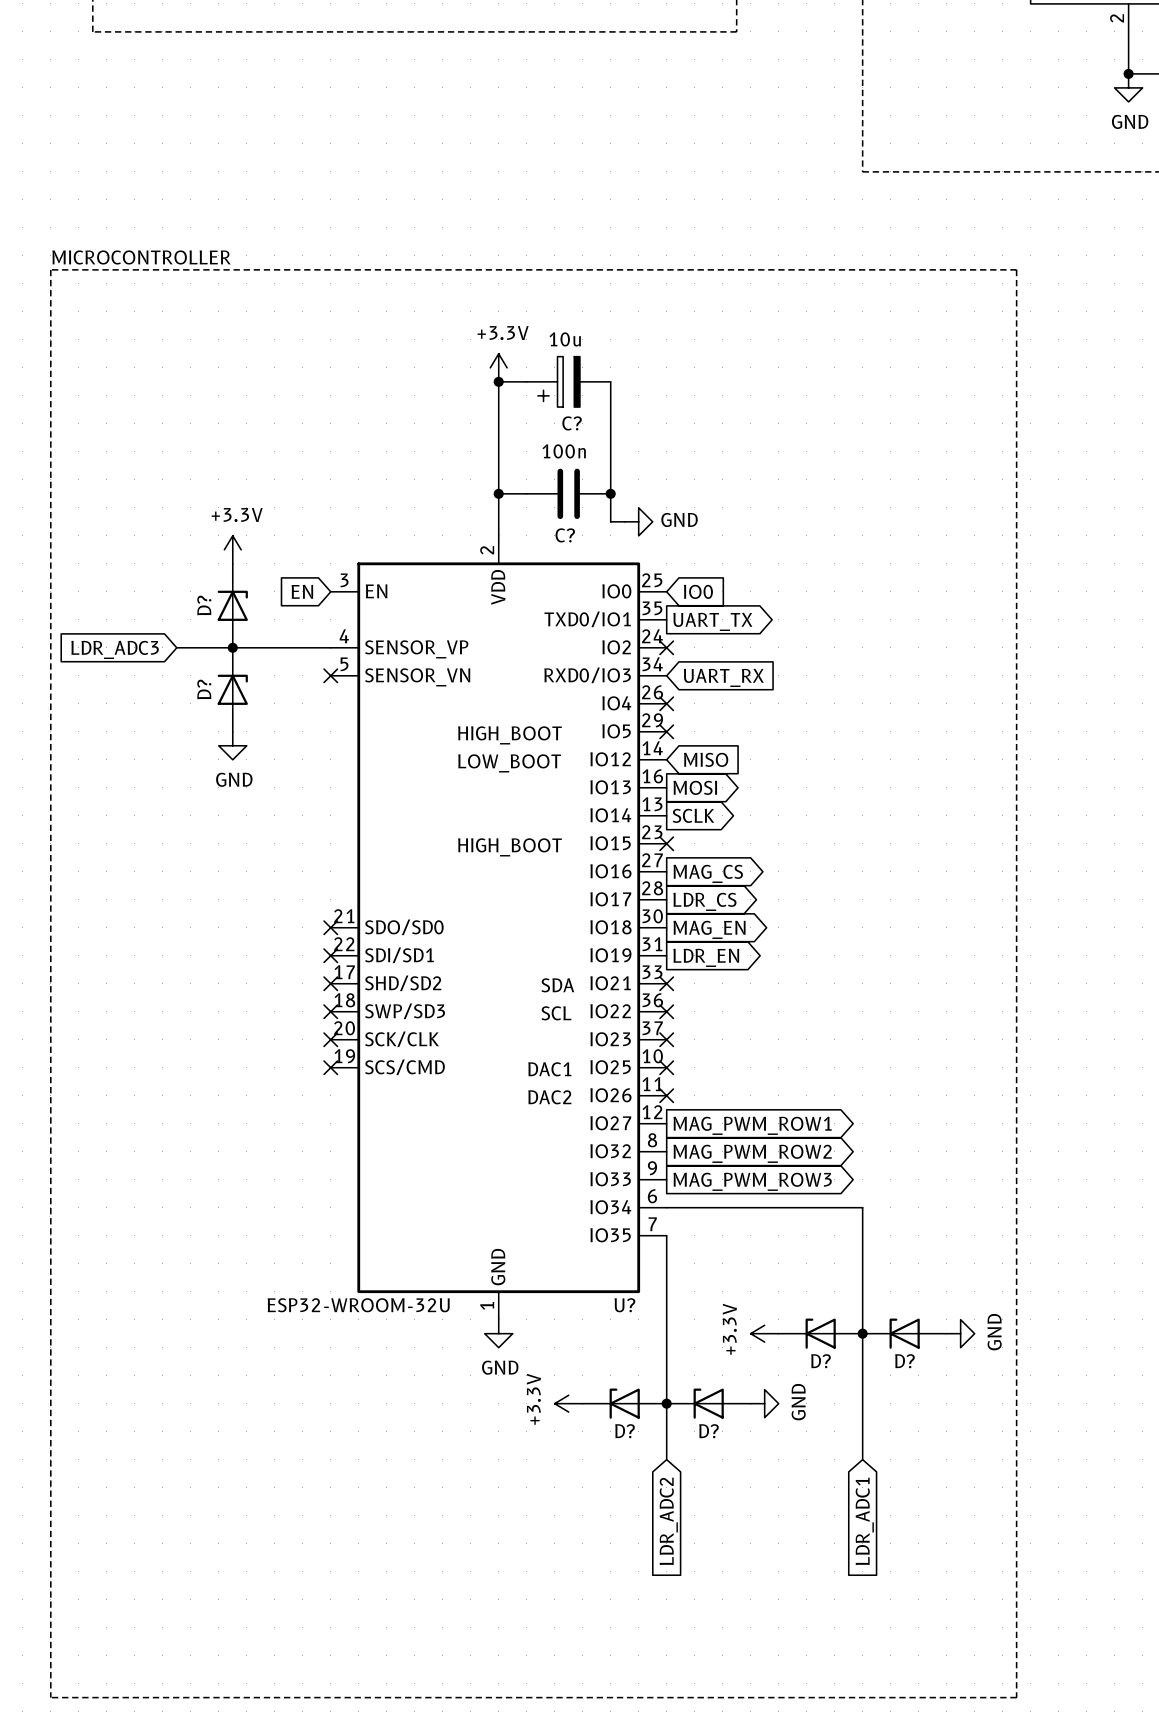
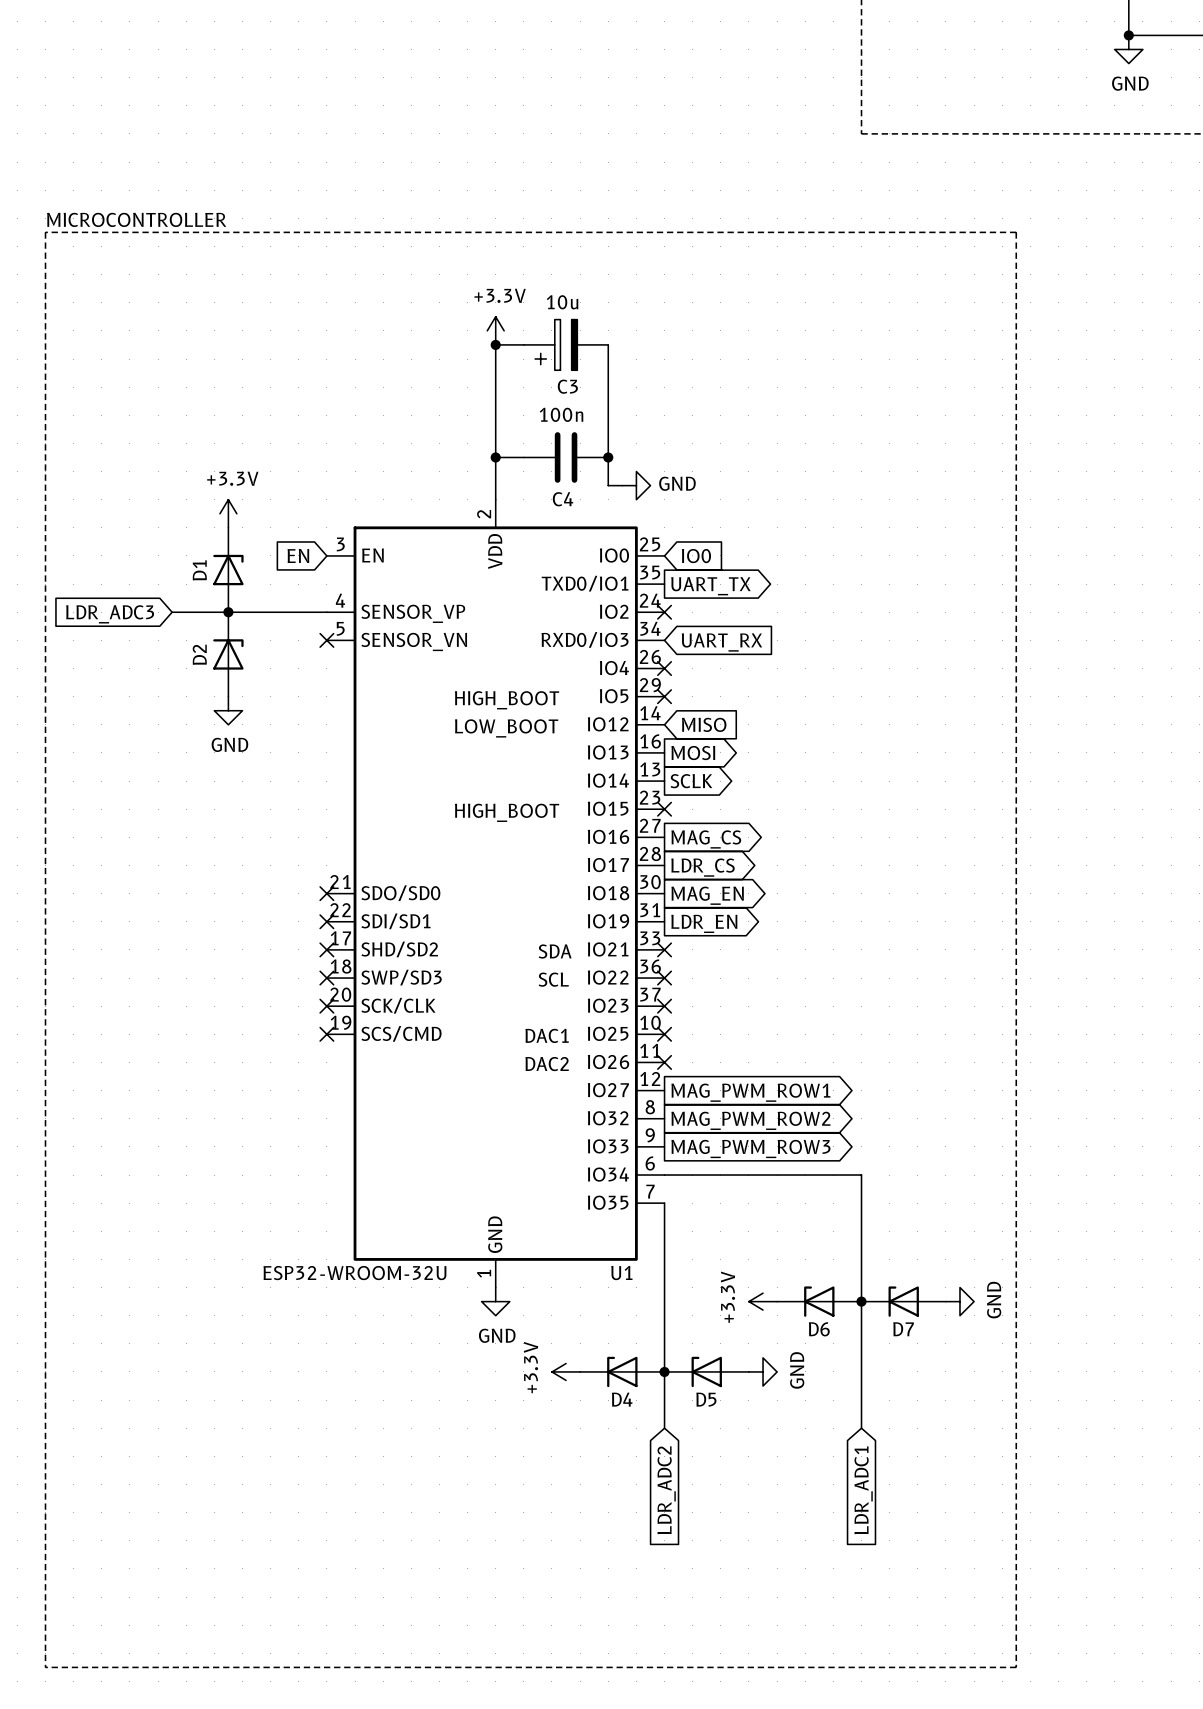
C? name: C? (572, 423) -> C3 (567, 386)
C? name: C? (565, 535) -> C4 (563, 499)
D? name: D? (204, 605) -> D1 (199, 570)
D? name: D? (204, 689) -> D2 (199, 654)
U? name: U? (624, 1305) -> U1 (621, 1273)
D? name: D? (820, 1361) -> D6 (819, 1329)
D? name: D? (904, 1361) -> D7 (903, 1329)
D? name: D? (625, 1431) -> D4 (622, 1399)
D? name: D? (709, 1431) -> D5 (706, 1399)

